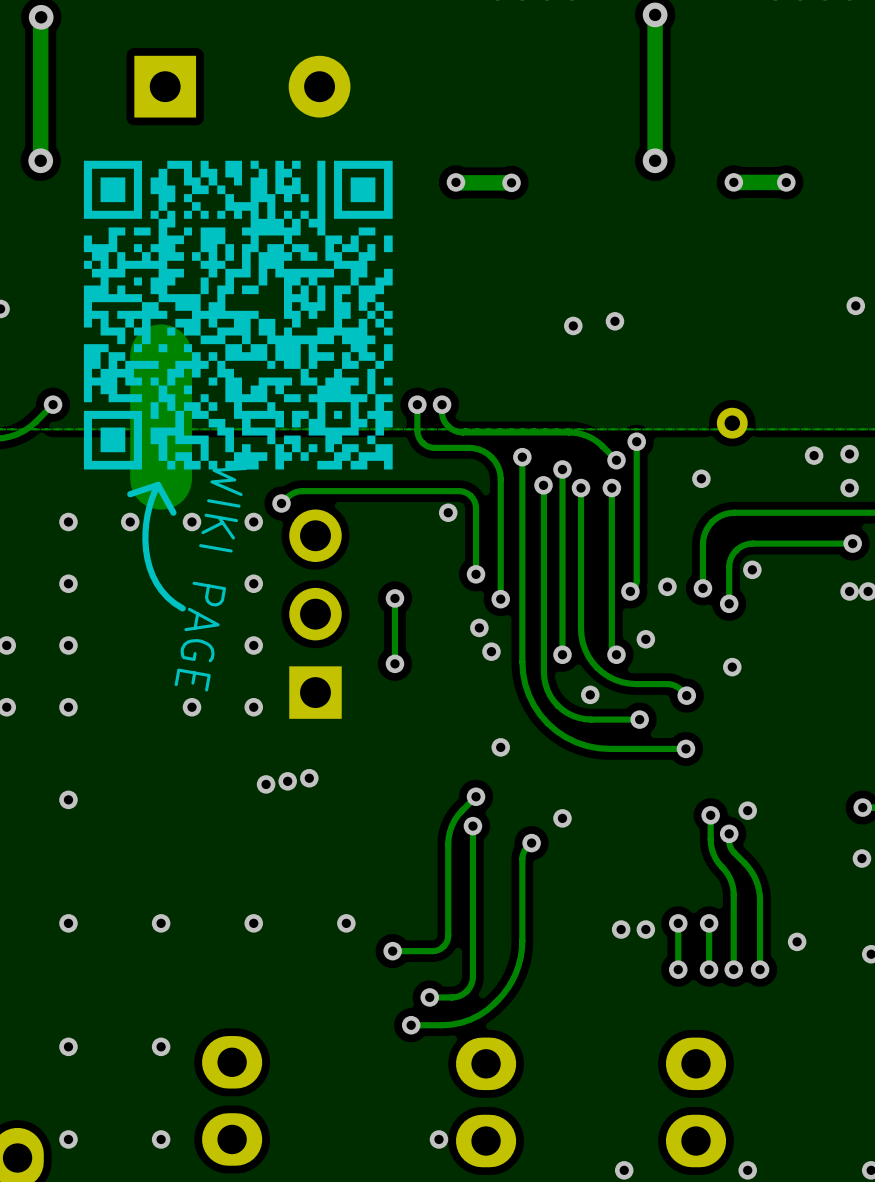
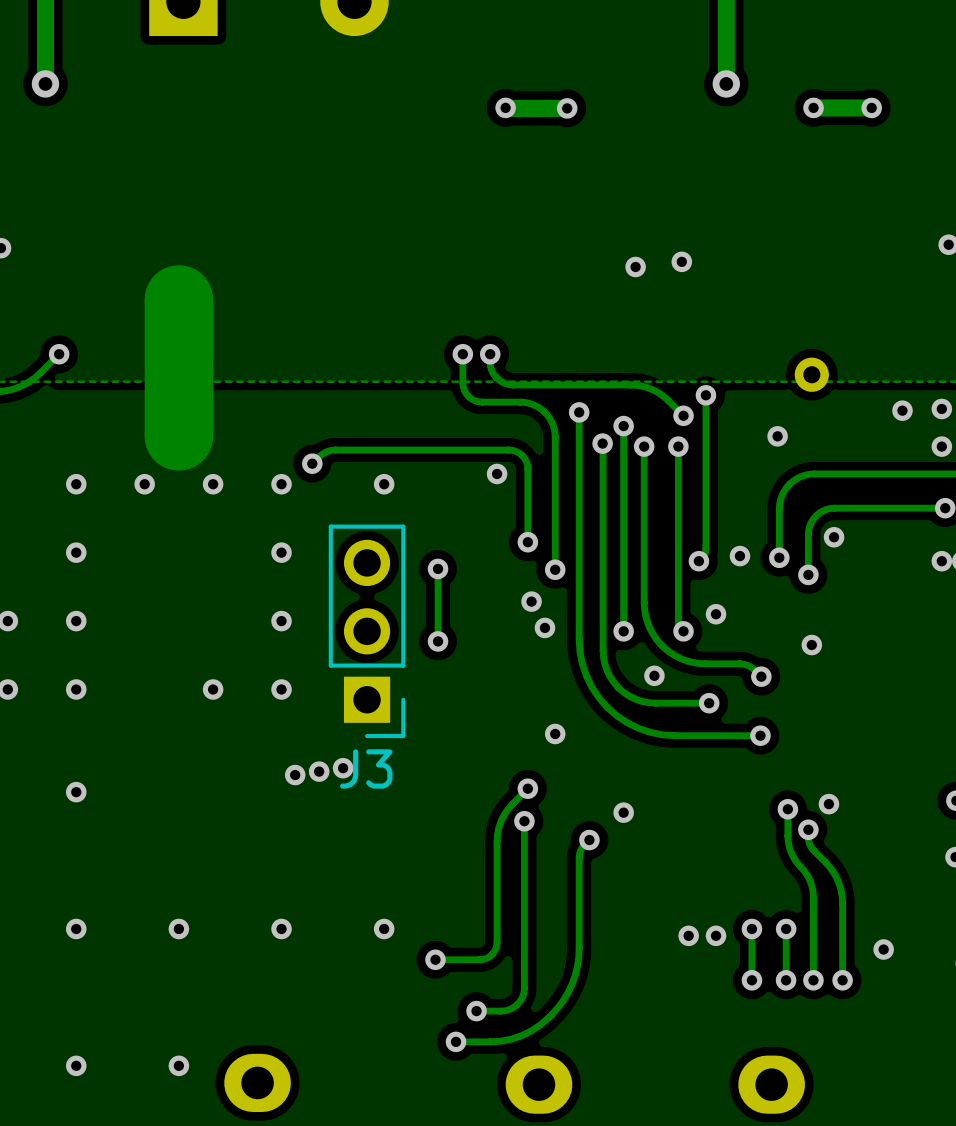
drawing: [83, 160, 393, 470] -> none
line: (158, 484) (130, 494) -> none
line: (158, 484) (173, 512) -> none
line: (158, 484) (149, 506) (146, 523) (147, 558) (152, 575) (161, 590) (182, 608) -> none
via: none -> (384, 484)
text: WIKI PAGE (210, 579) -> none
part: (315, 614) -> none
J3: none -> (367, 631)

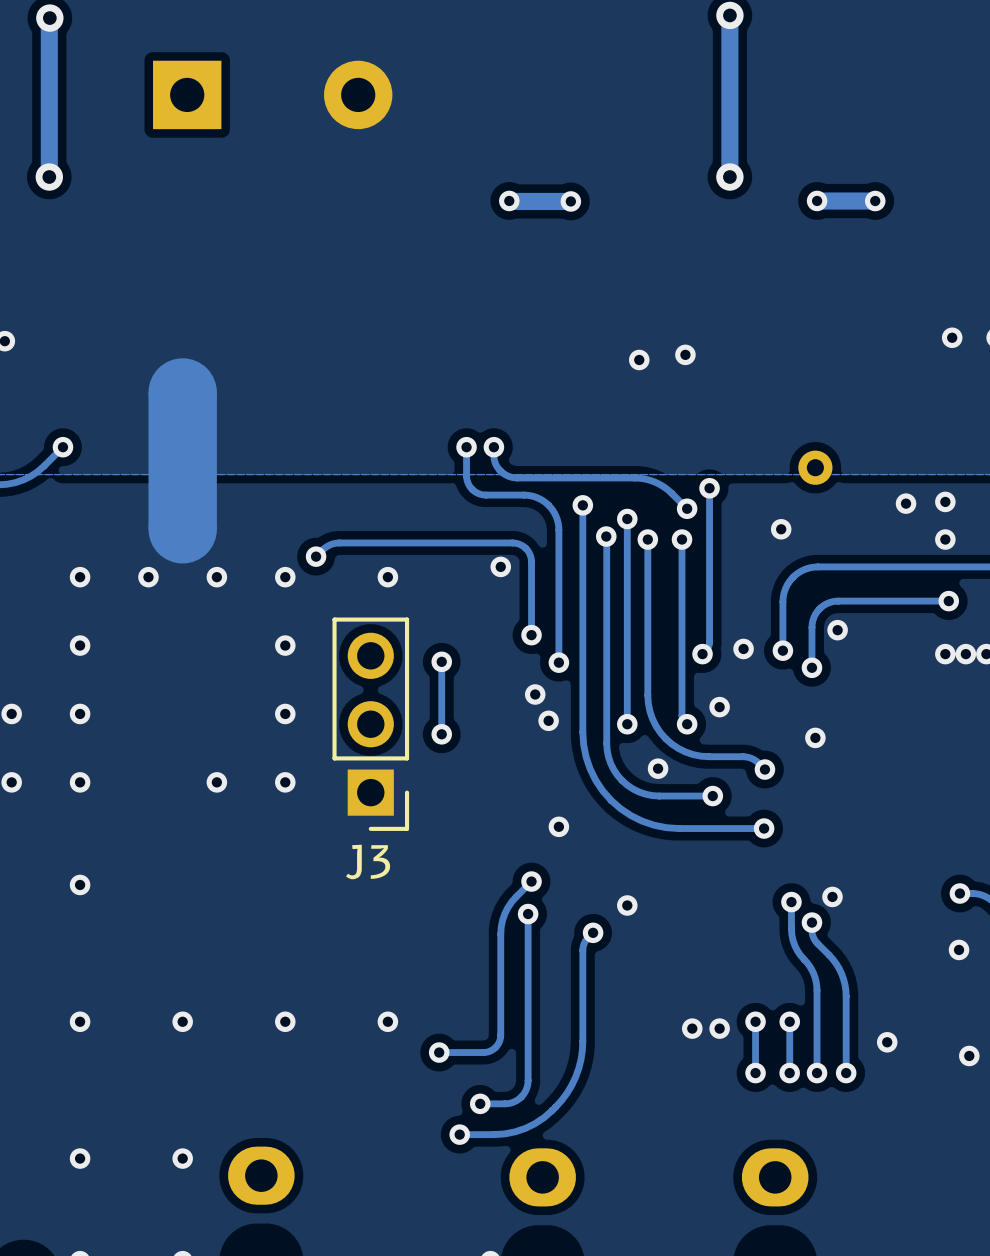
via: (343, 768) -> none
via: (319, 771) -> none
via: (295, 775) -> none

